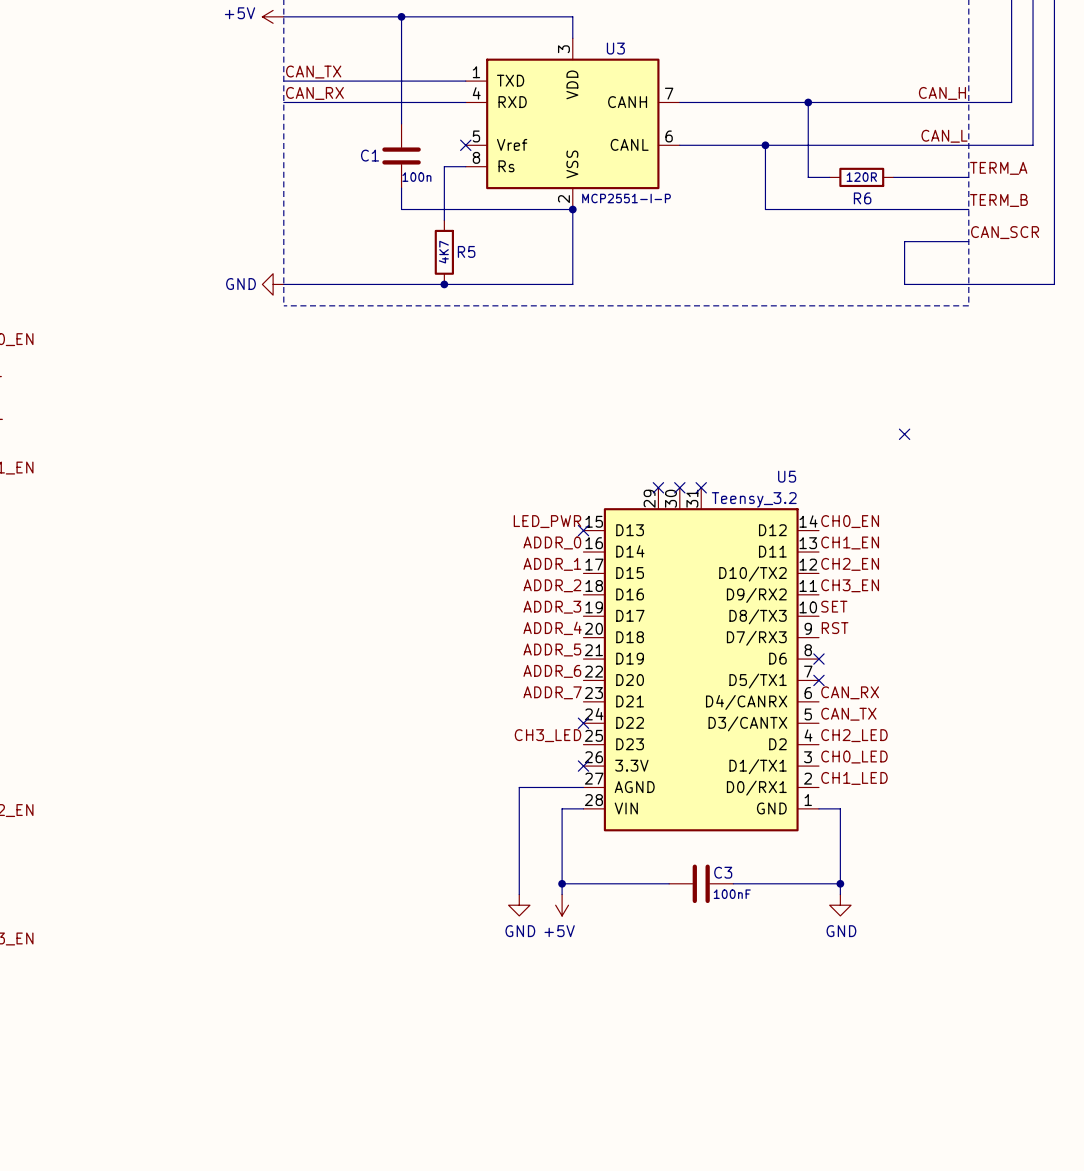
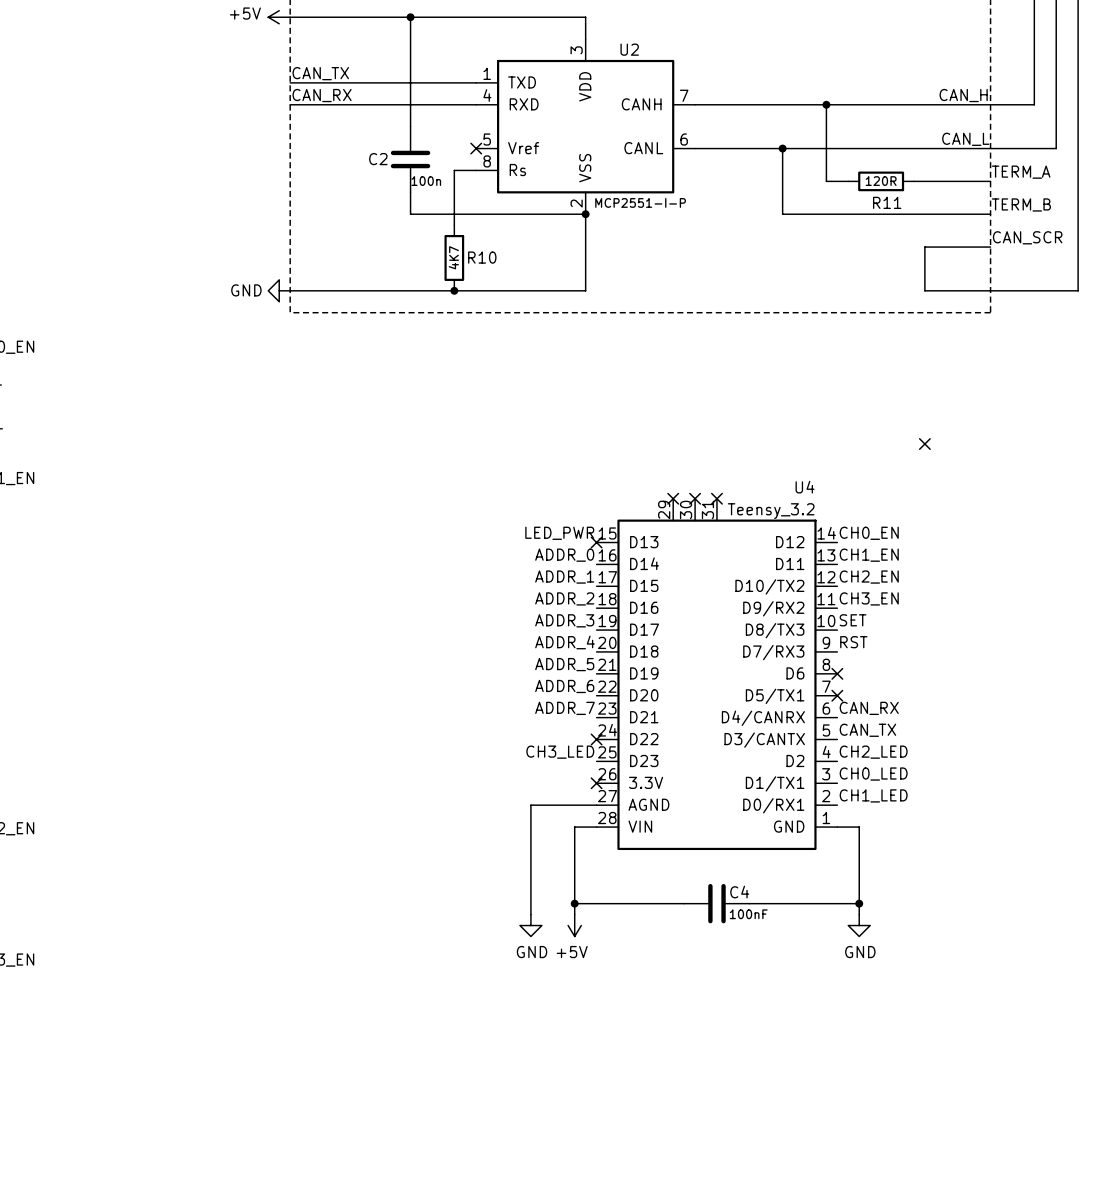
U3 name: U3 (615, 48) -> U2 (629, 49)
C1 name: C1 (370, 155) -> C2 (378, 159)
R6 name: R6 (862, 198) -> R11 (887, 202)
R5 name: R5 (466, 251) -> R10 (482, 257)
U5 name: U5 (787, 476) -> U4 (805, 487)
C3 name: C3 (723, 872) -> C4 (739, 892)

